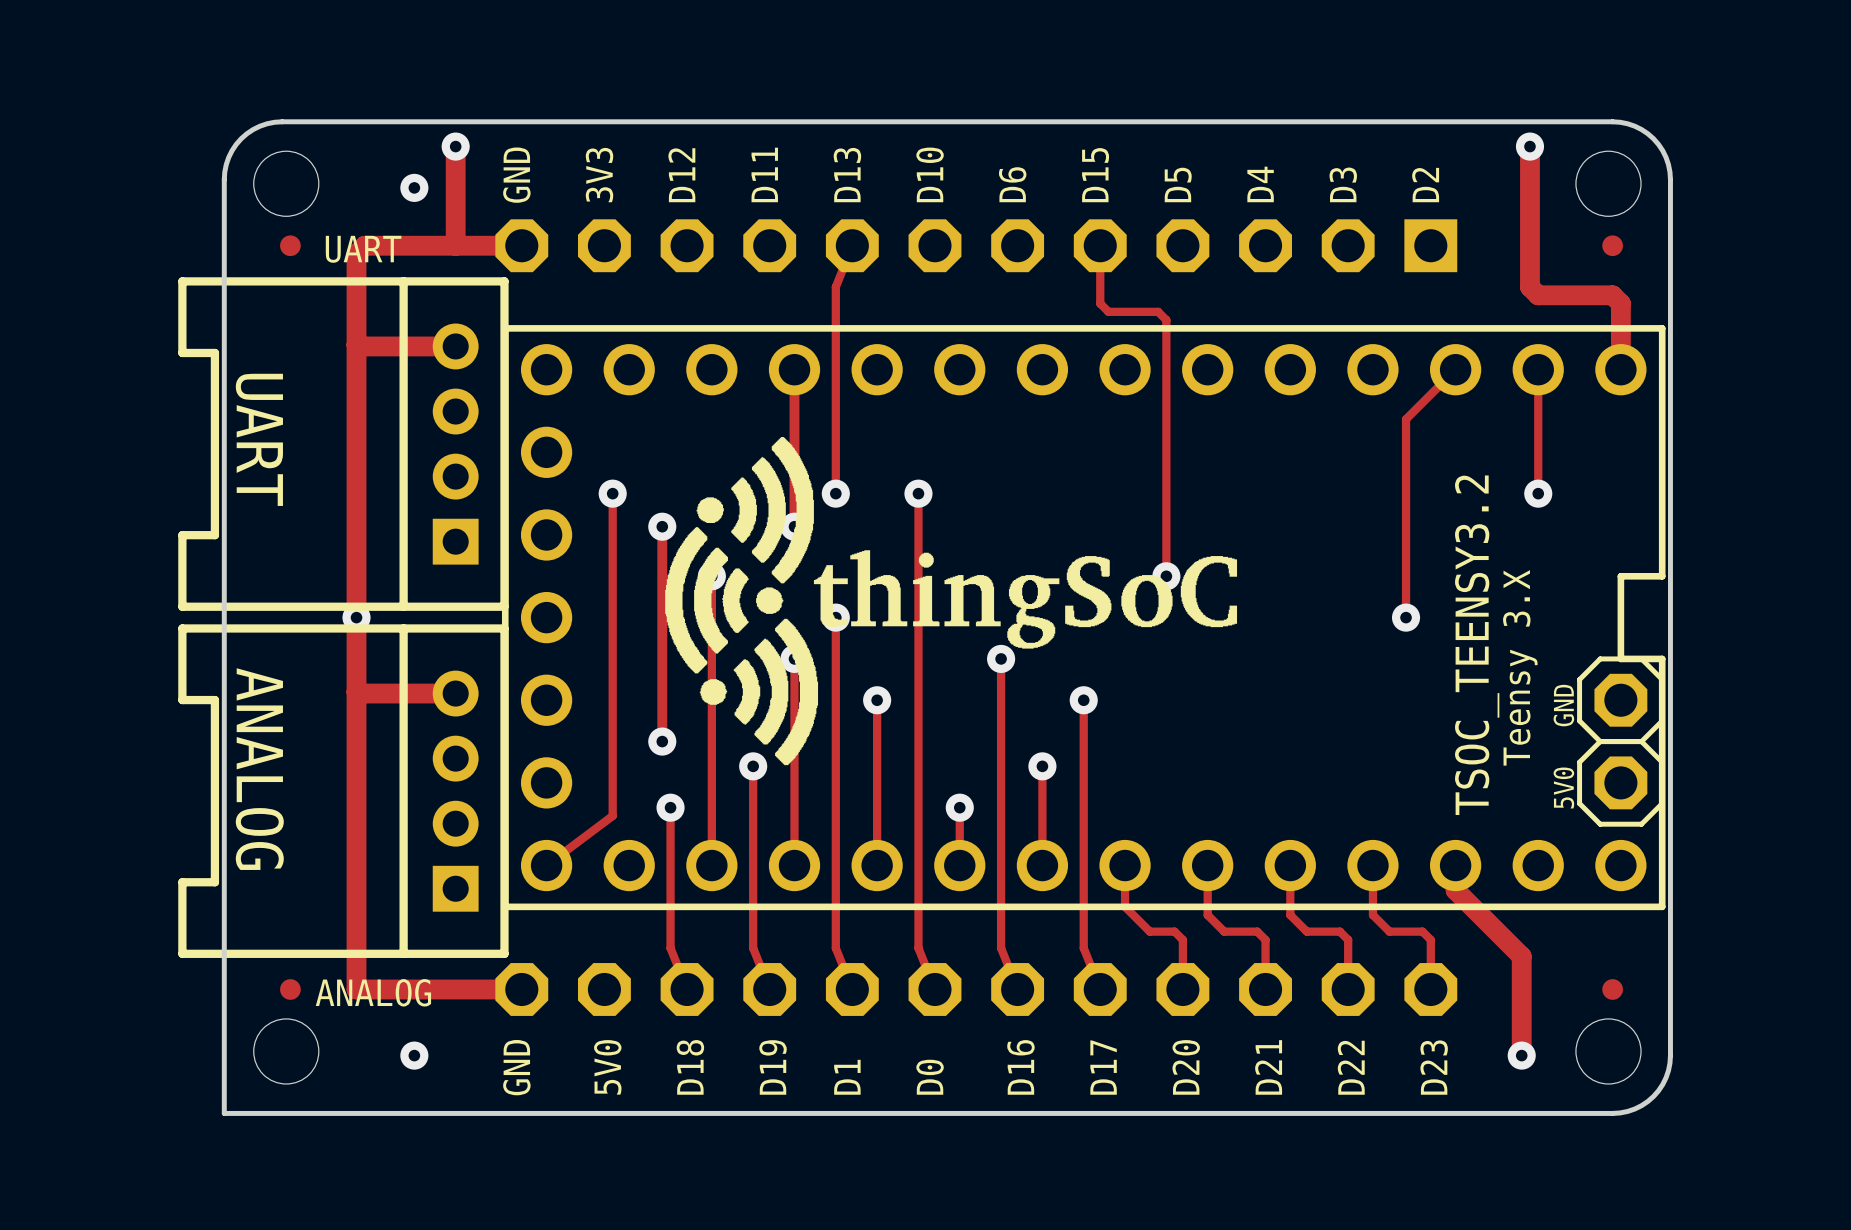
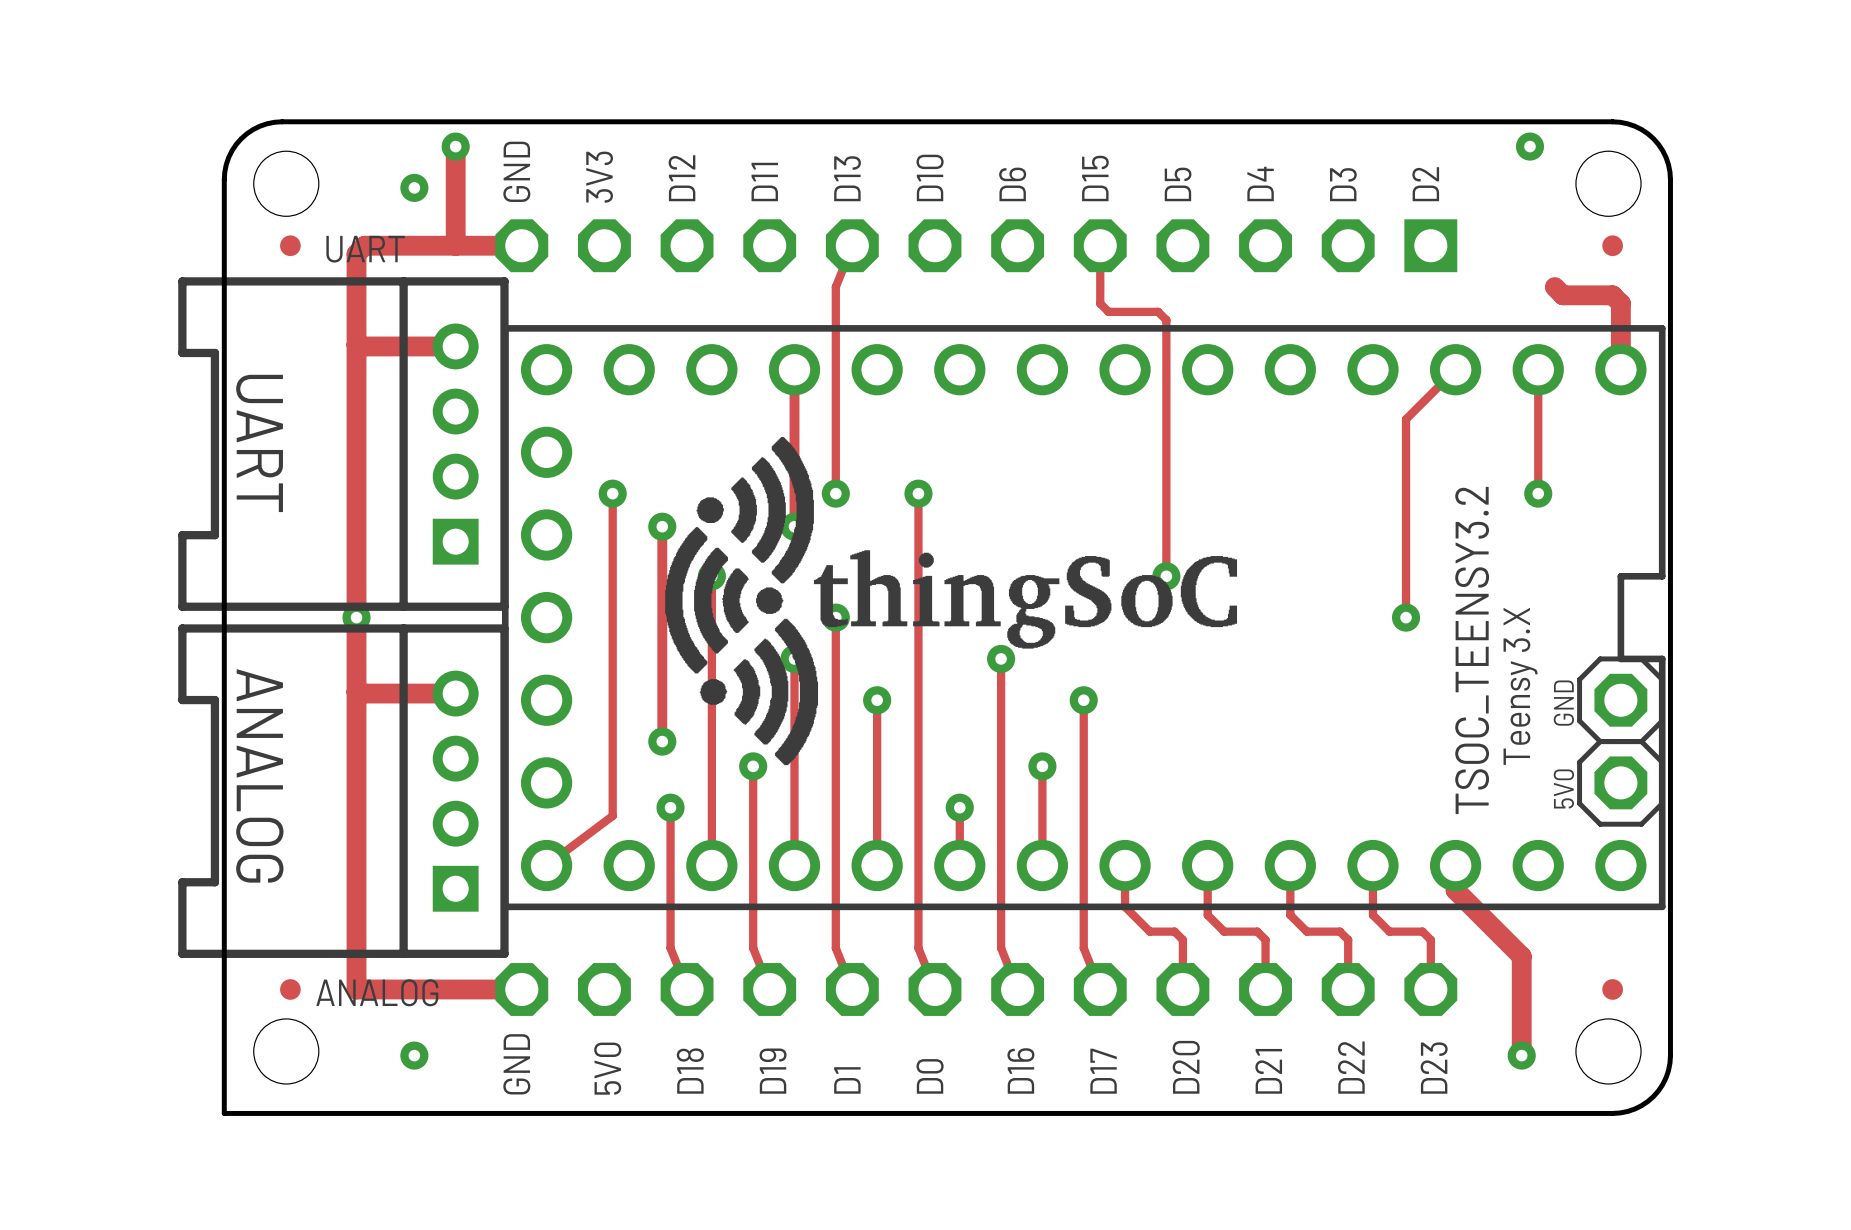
track: (1529, 146) (1529, 287) (1538, 295) (1563, 295) -> (1554, 287) (1563, 295)

